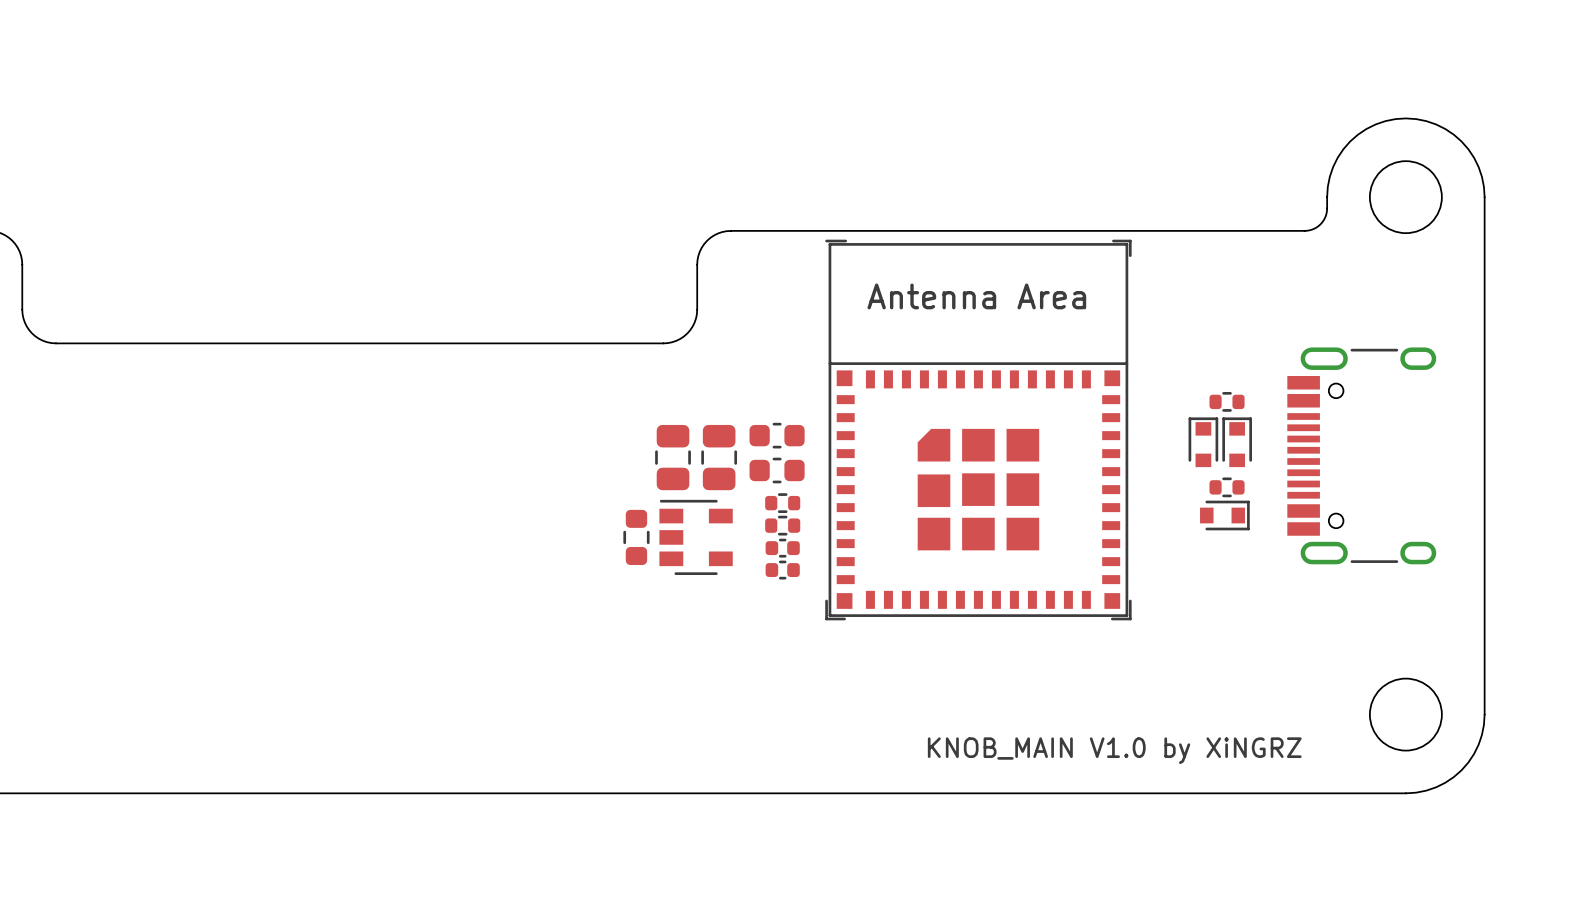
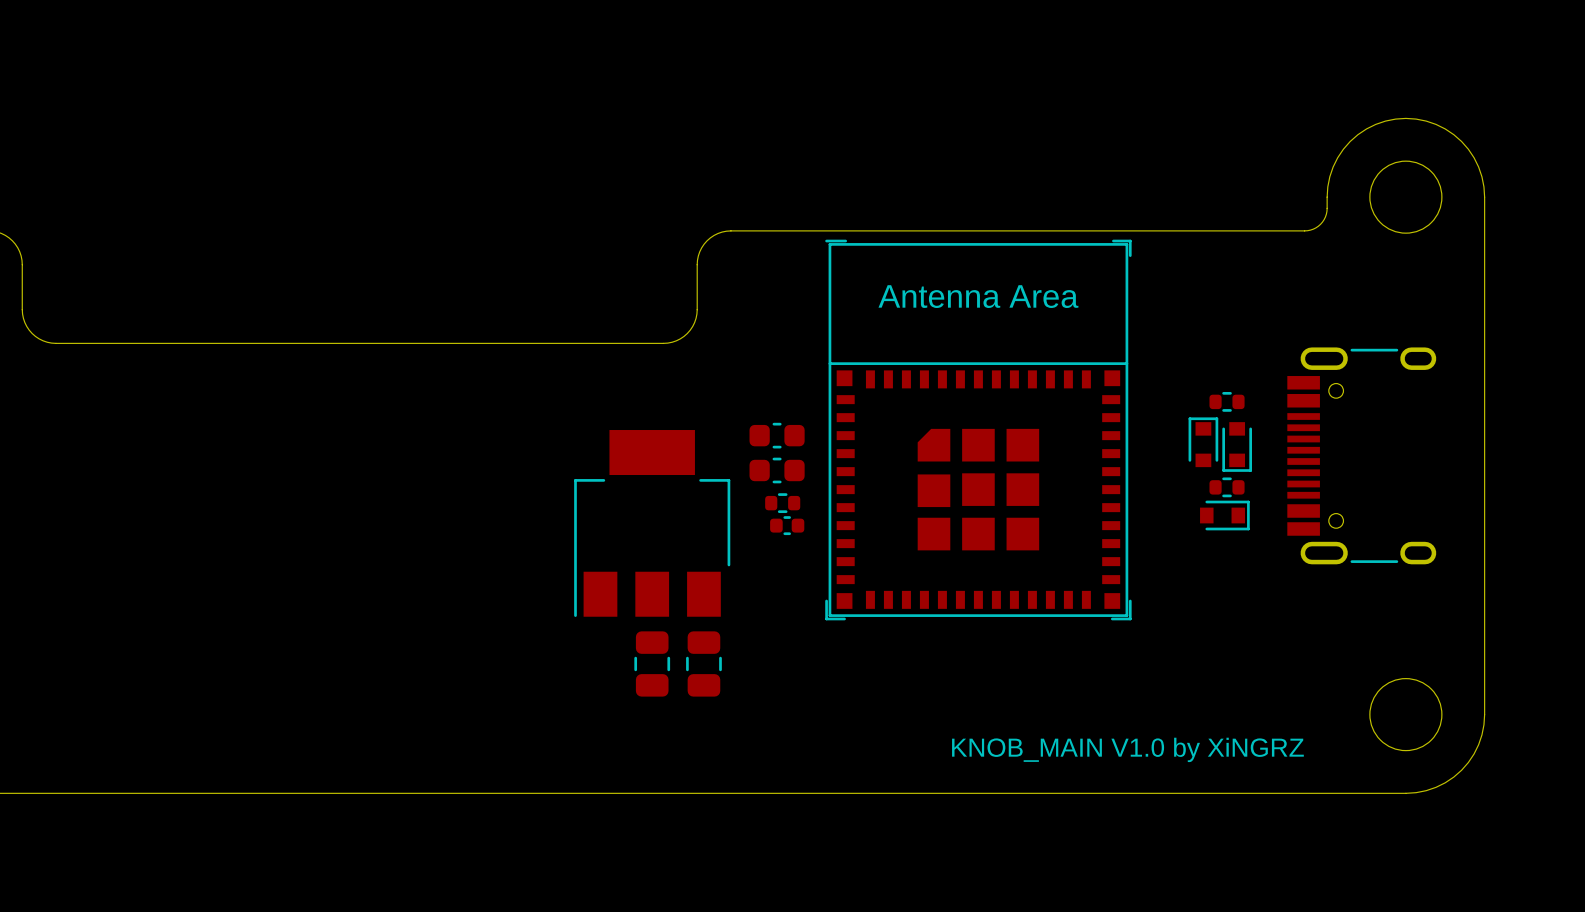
part rotation: 0° (1237, 442) -> 180° (1237, 446)
part: (673, 457) -> none
part: (719, 457) -> none
part footprint: [623, 509, 650, 565] -> [574, 430, 731, 617]
part footprint: [765, 515, 801, 536] -> [770, 516, 805, 536]
part: (696, 537) -> none
part: (782, 548) -> none
part: (782, 570) -> none
part: none -> (652, 663)
part: none -> (703, 663)

